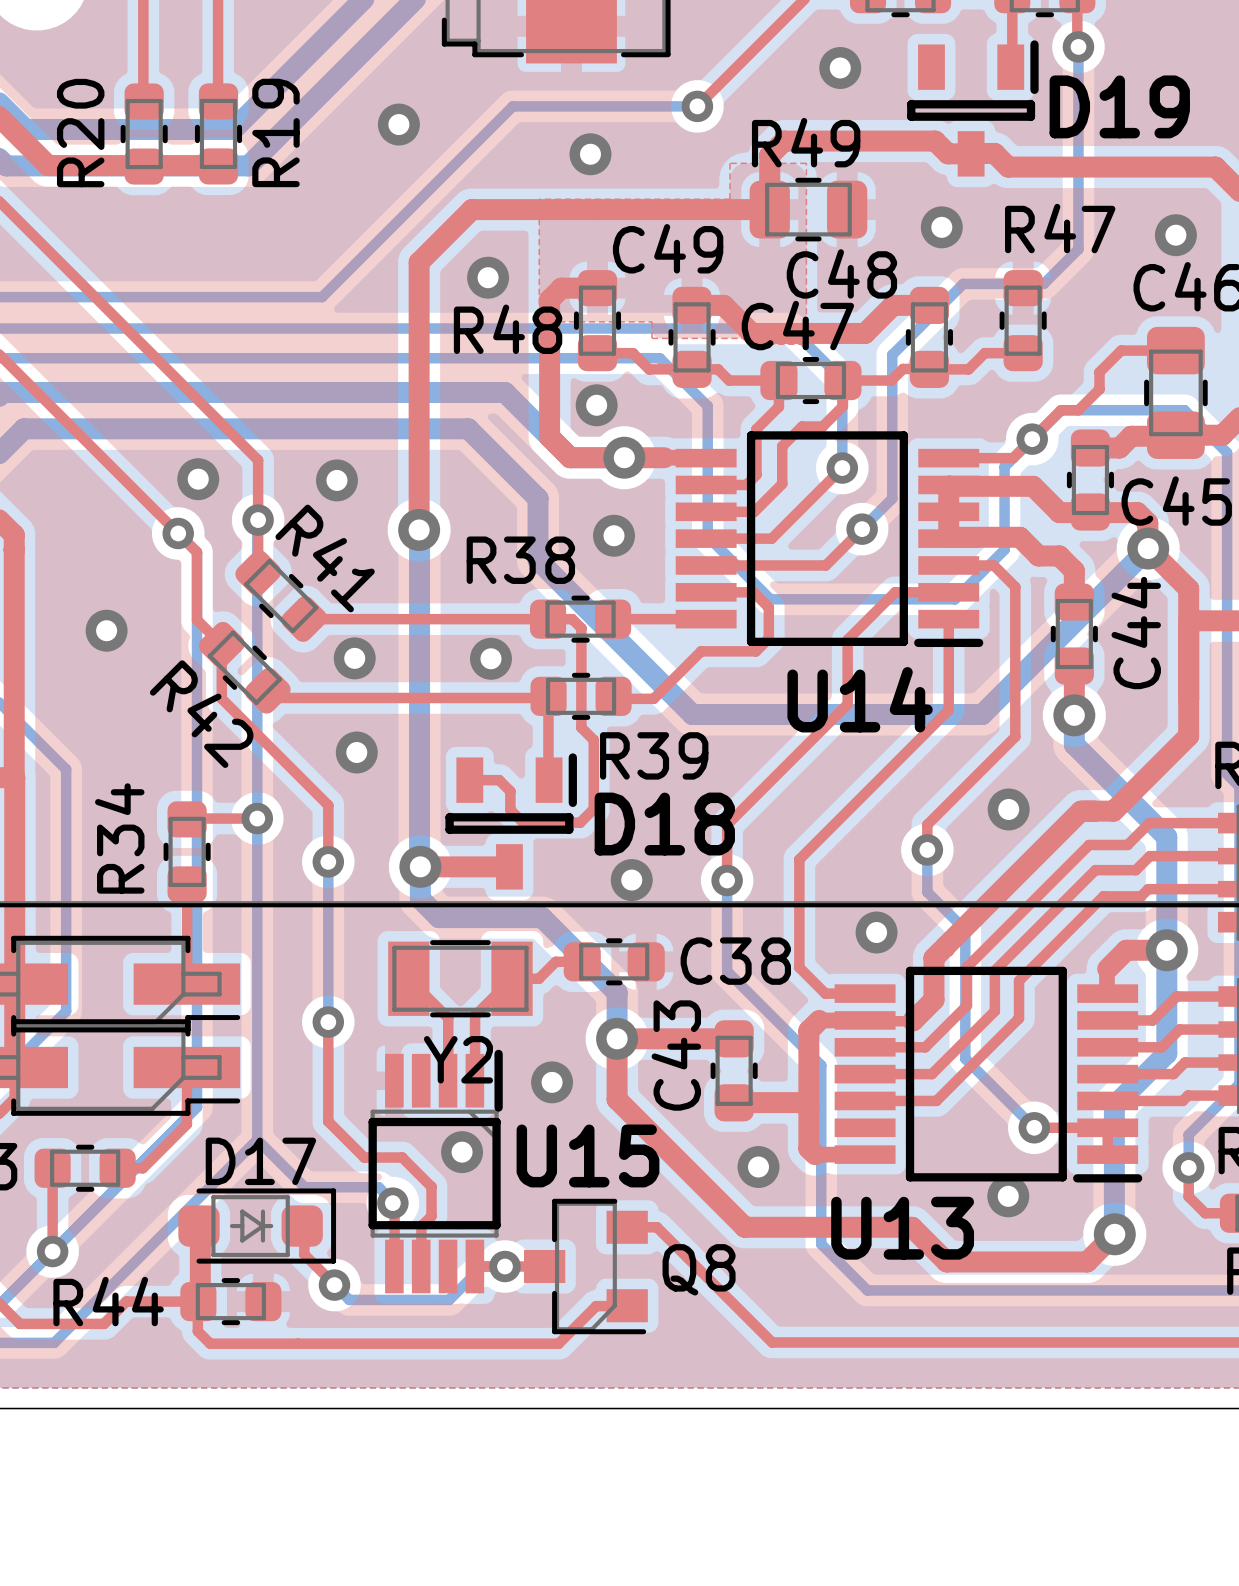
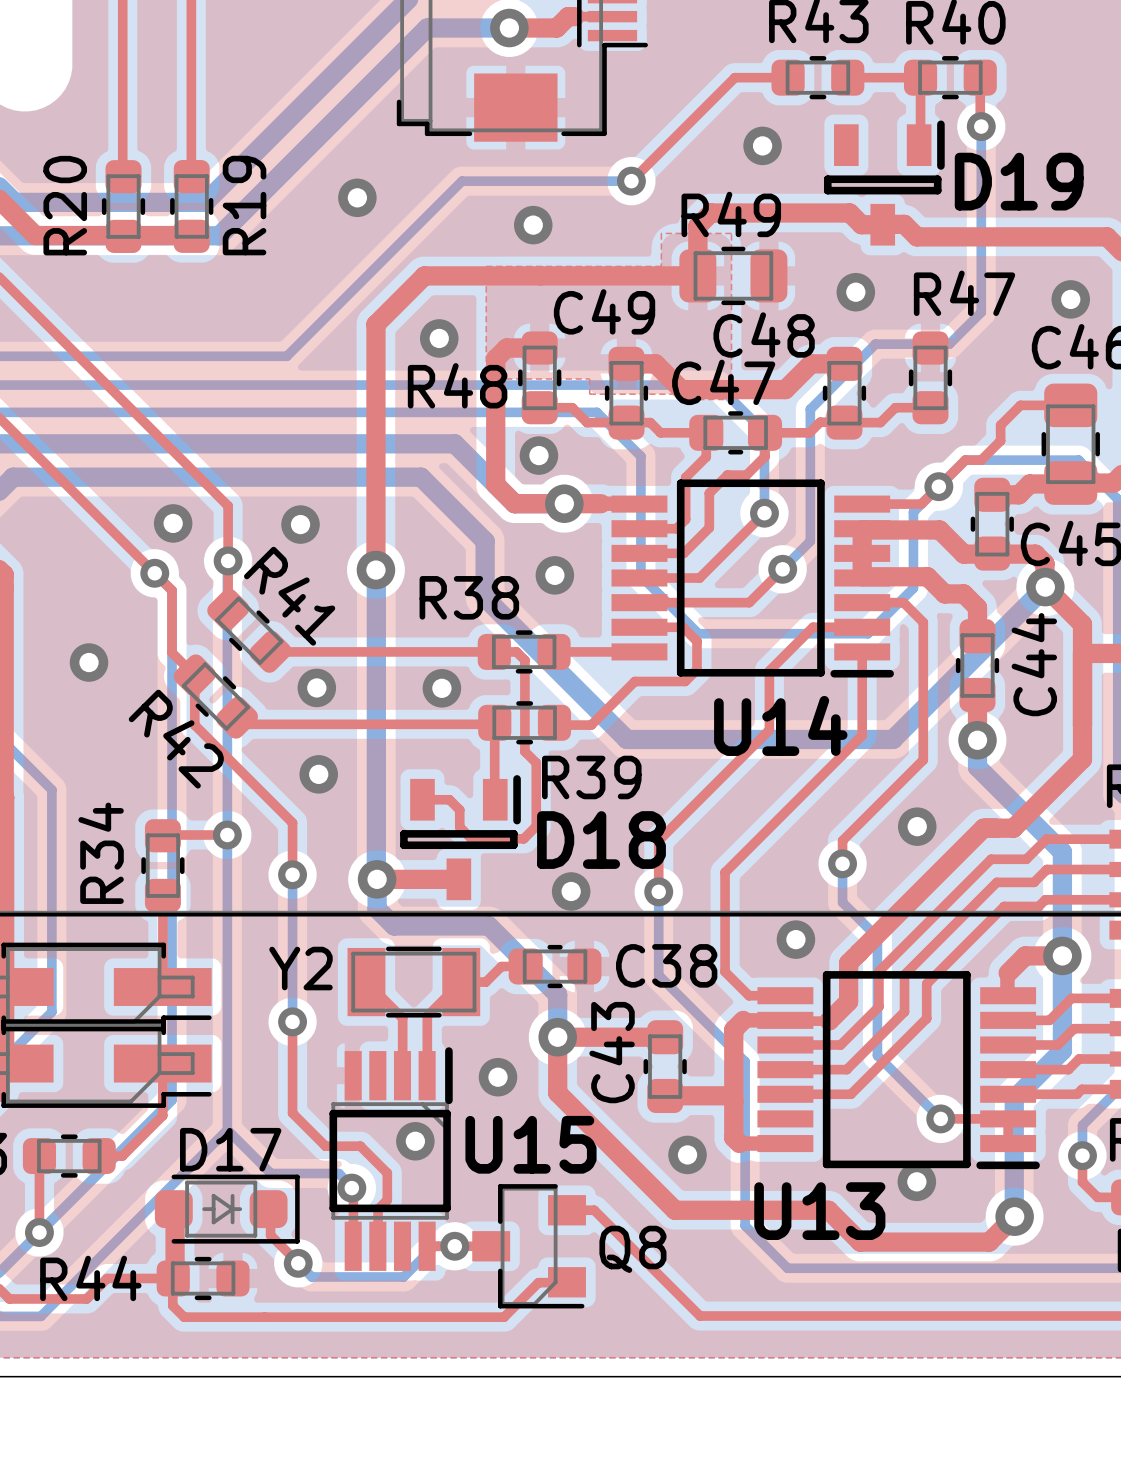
Y2 name position: Y2 (458, 1059) -> Y2 (300, 968)

